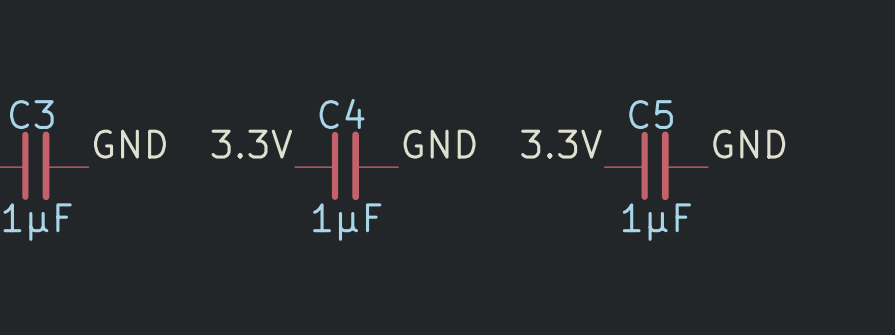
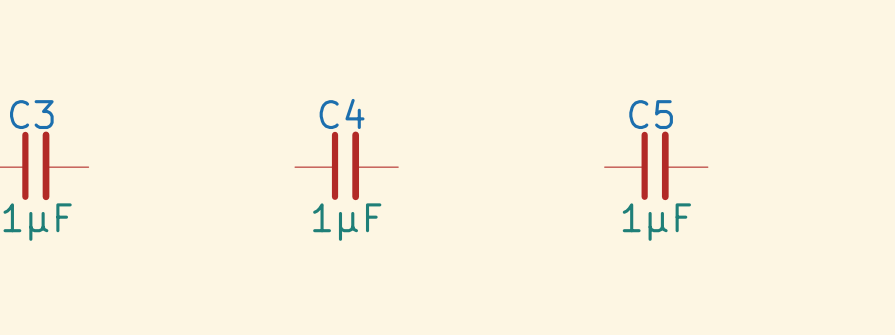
label: GND (129, 144) -> none
label: 3.3V (251, 144) -> none
label: GND (439, 144) -> none
label: 3.3V (561, 144) -> none
label: GND (749, 144) -> none

